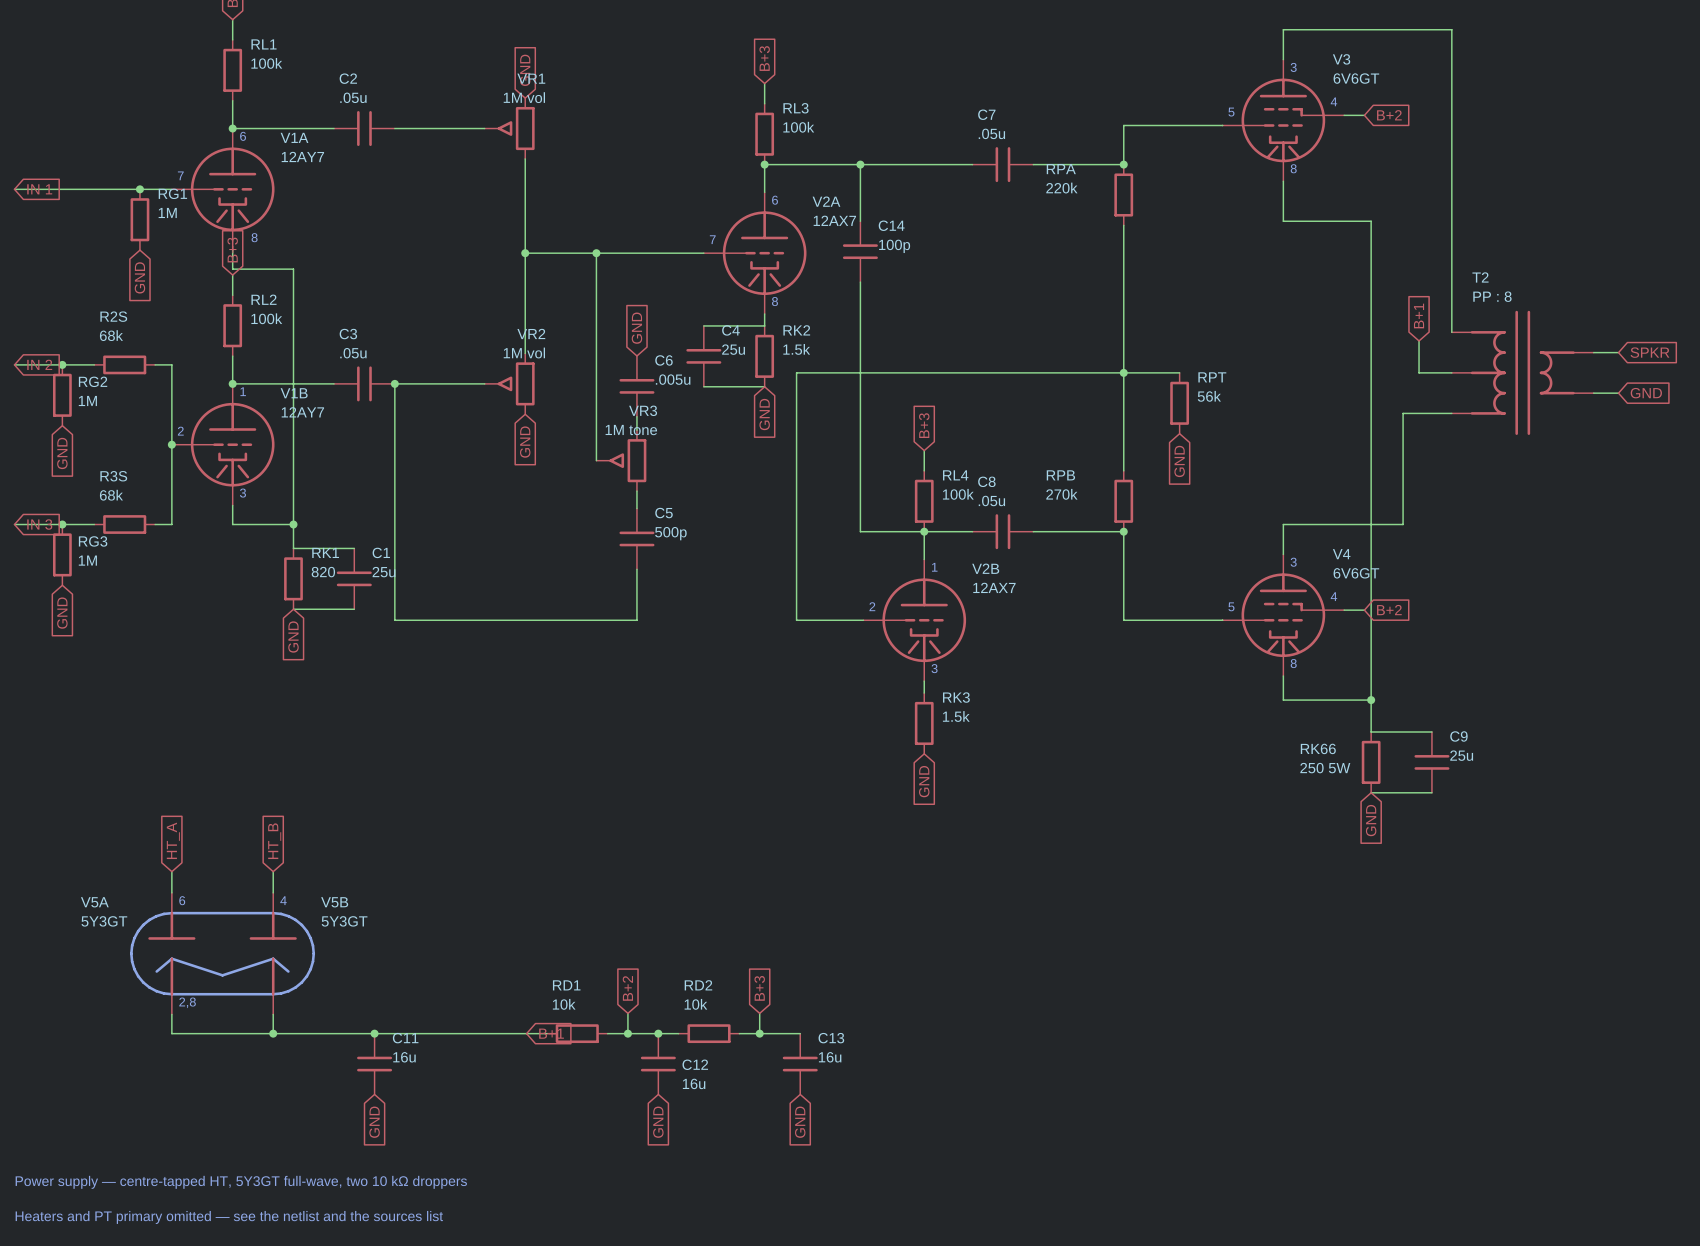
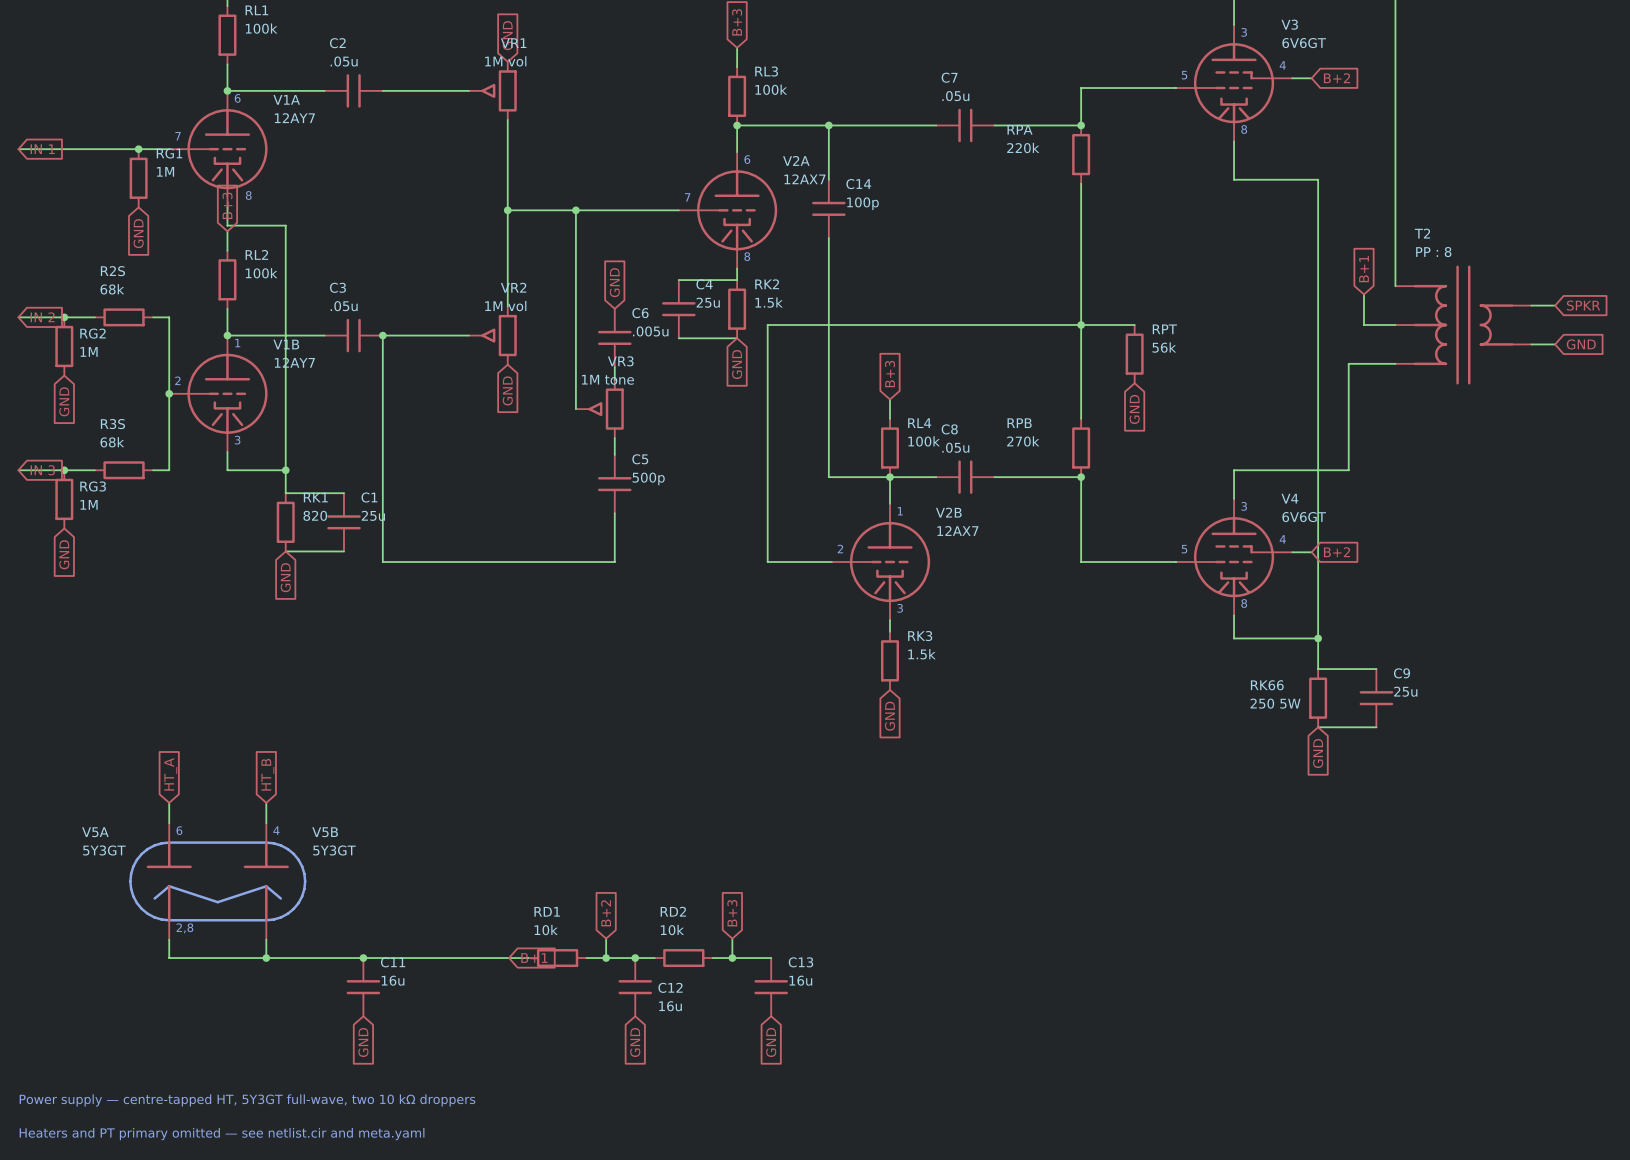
text: Heaters and PT primary omitted — see the netlist and the sources list (229, 1217) -> Heaters and PT primary omitted — see netlist.cir and meta.yaml (222, 1134)

